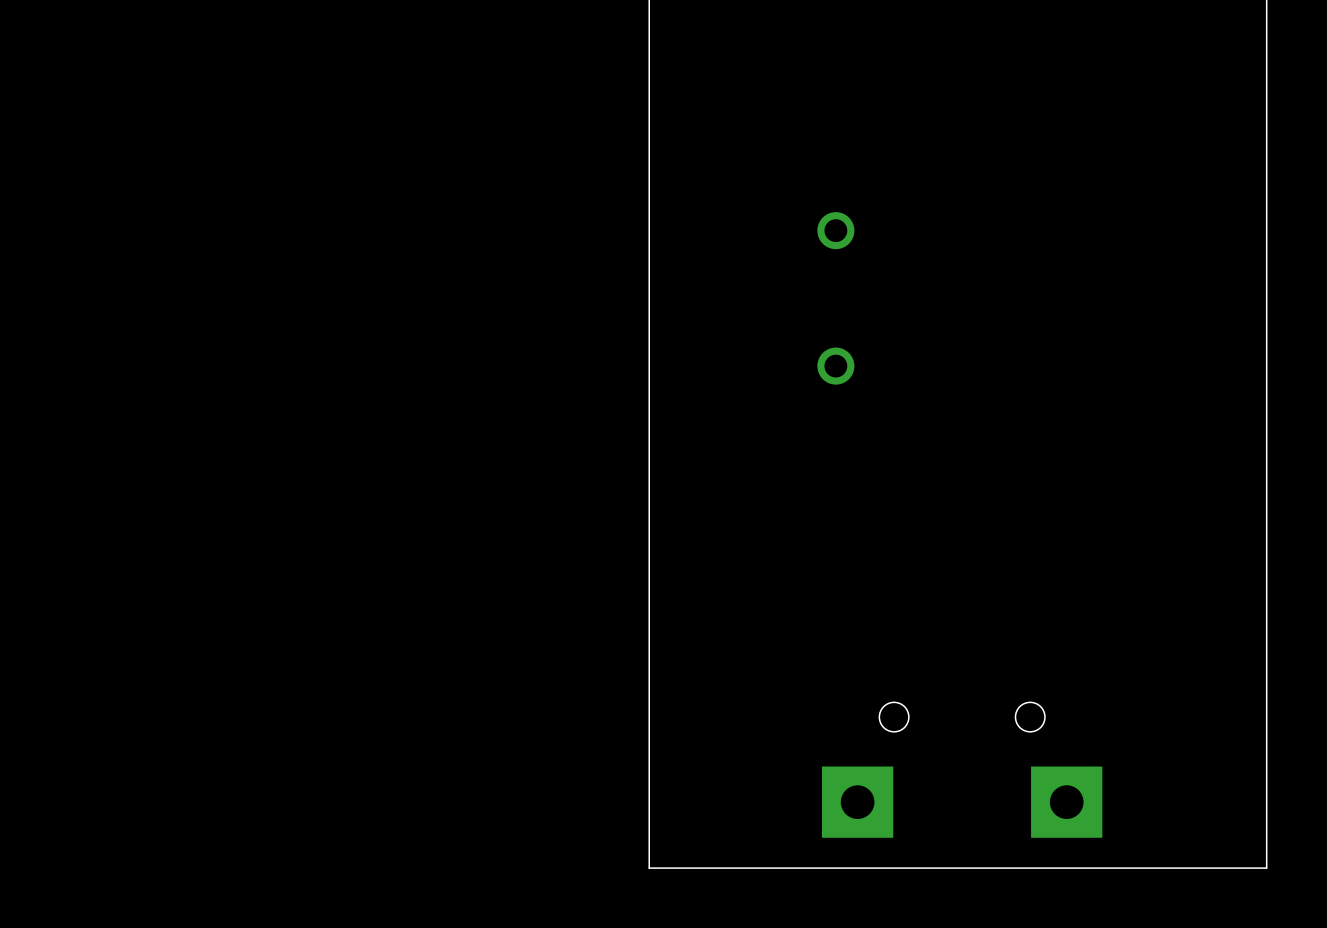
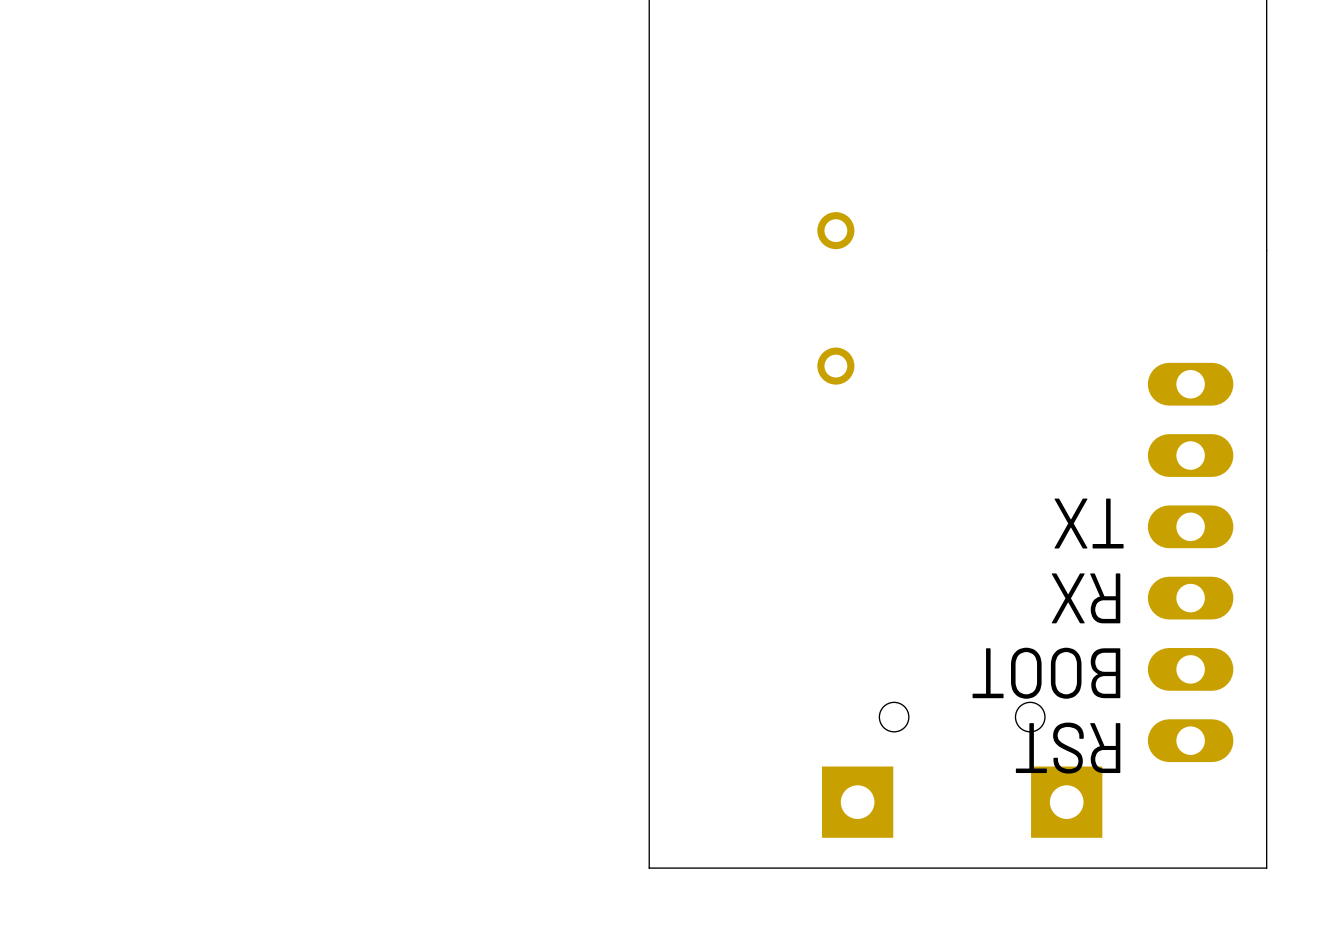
text: none -> TX (1089, 523)
part: none -> (1190, 562)
text: none -> RX (1086, 598)
text: none -> BOOT (1046, 673)
text: none -> RST (1068, 748)

